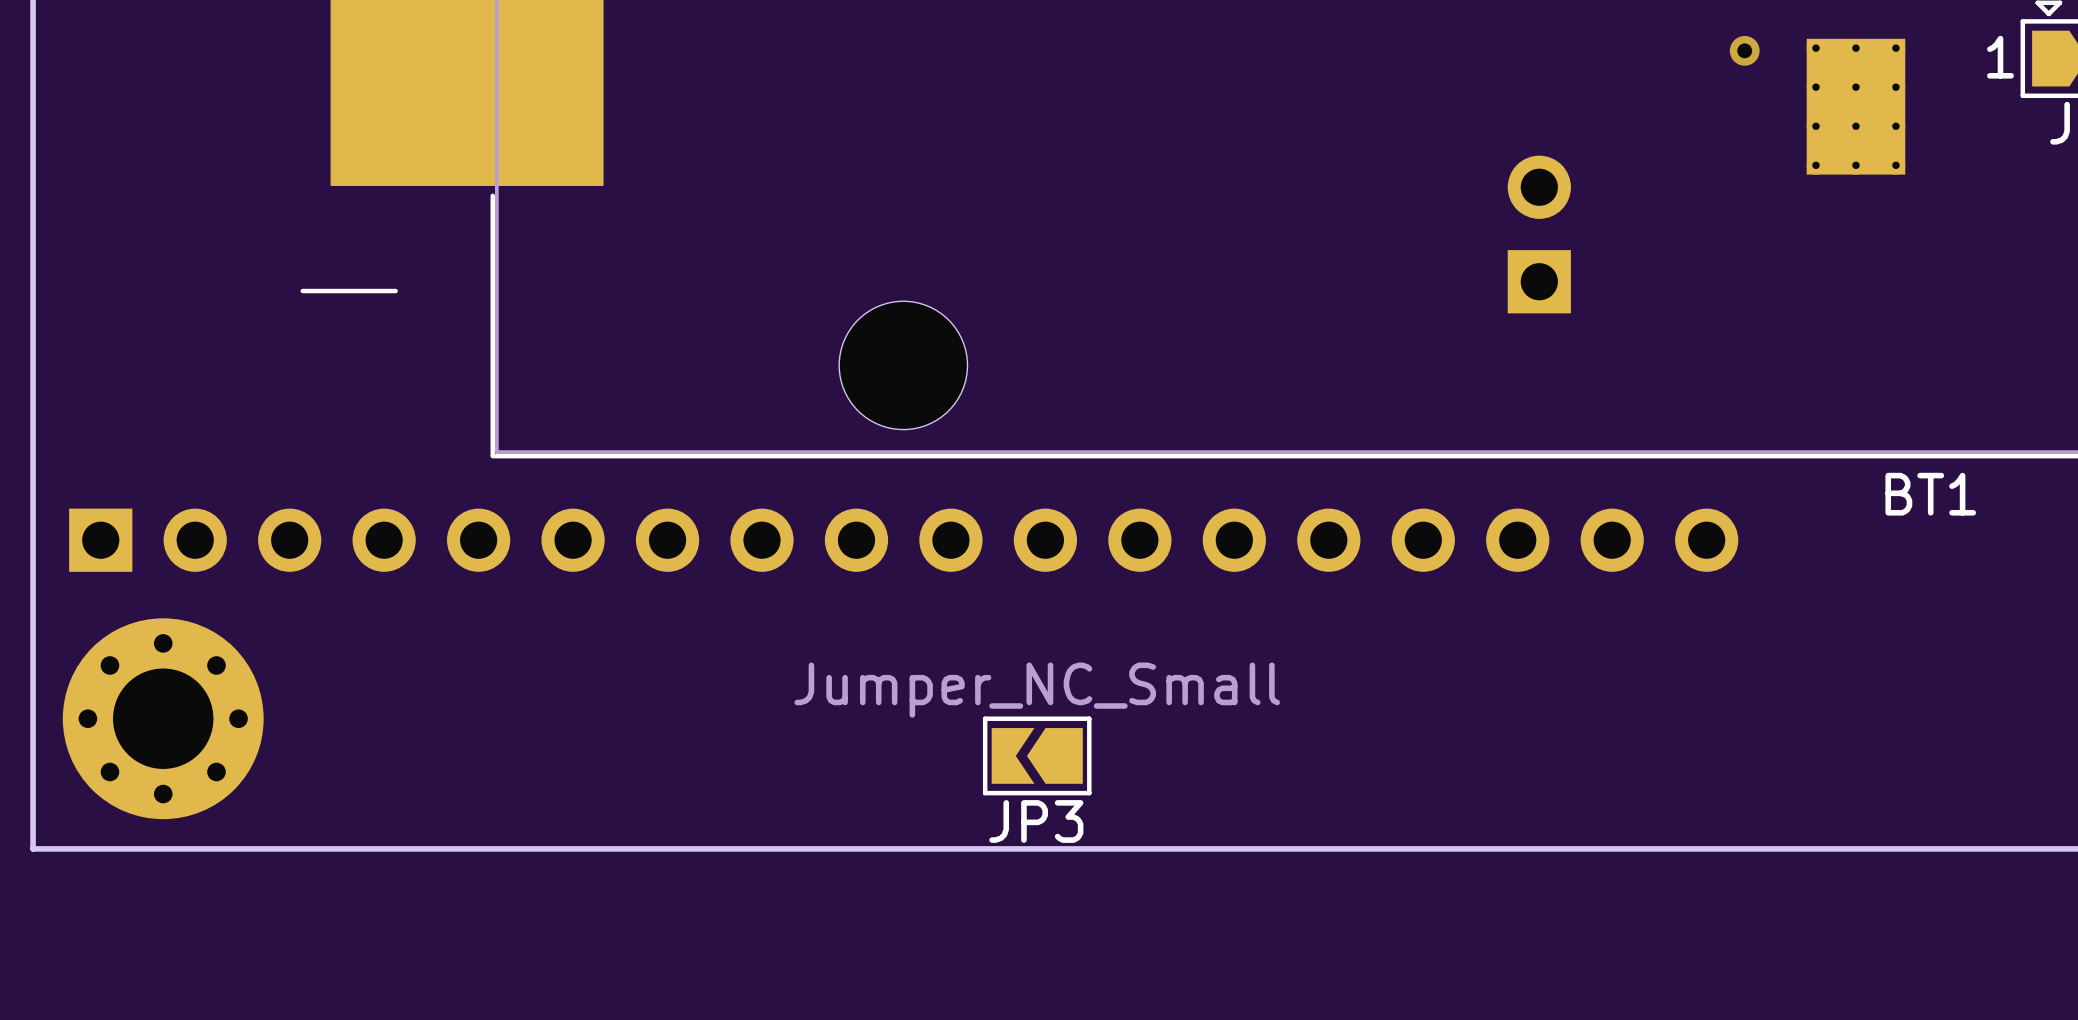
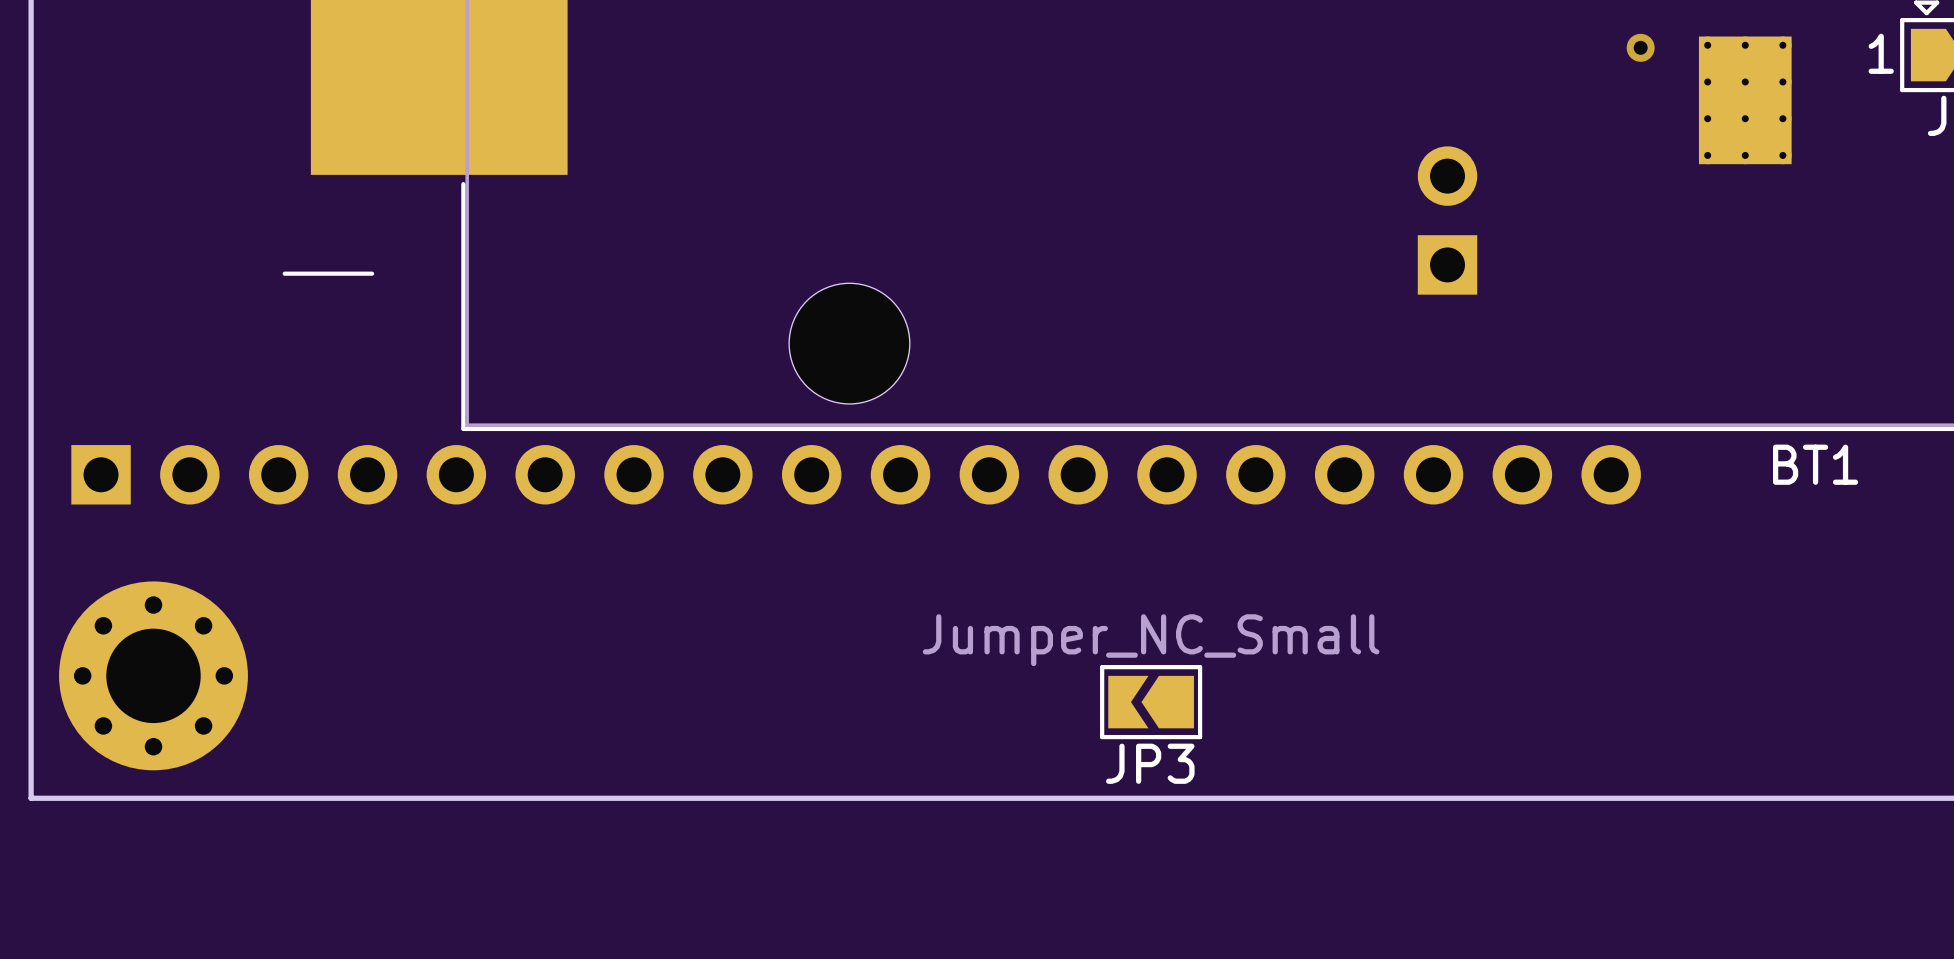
part position: (903, 540) -> (856, 474)
JP3 position: (1037, 755) -> (1151, 702)

